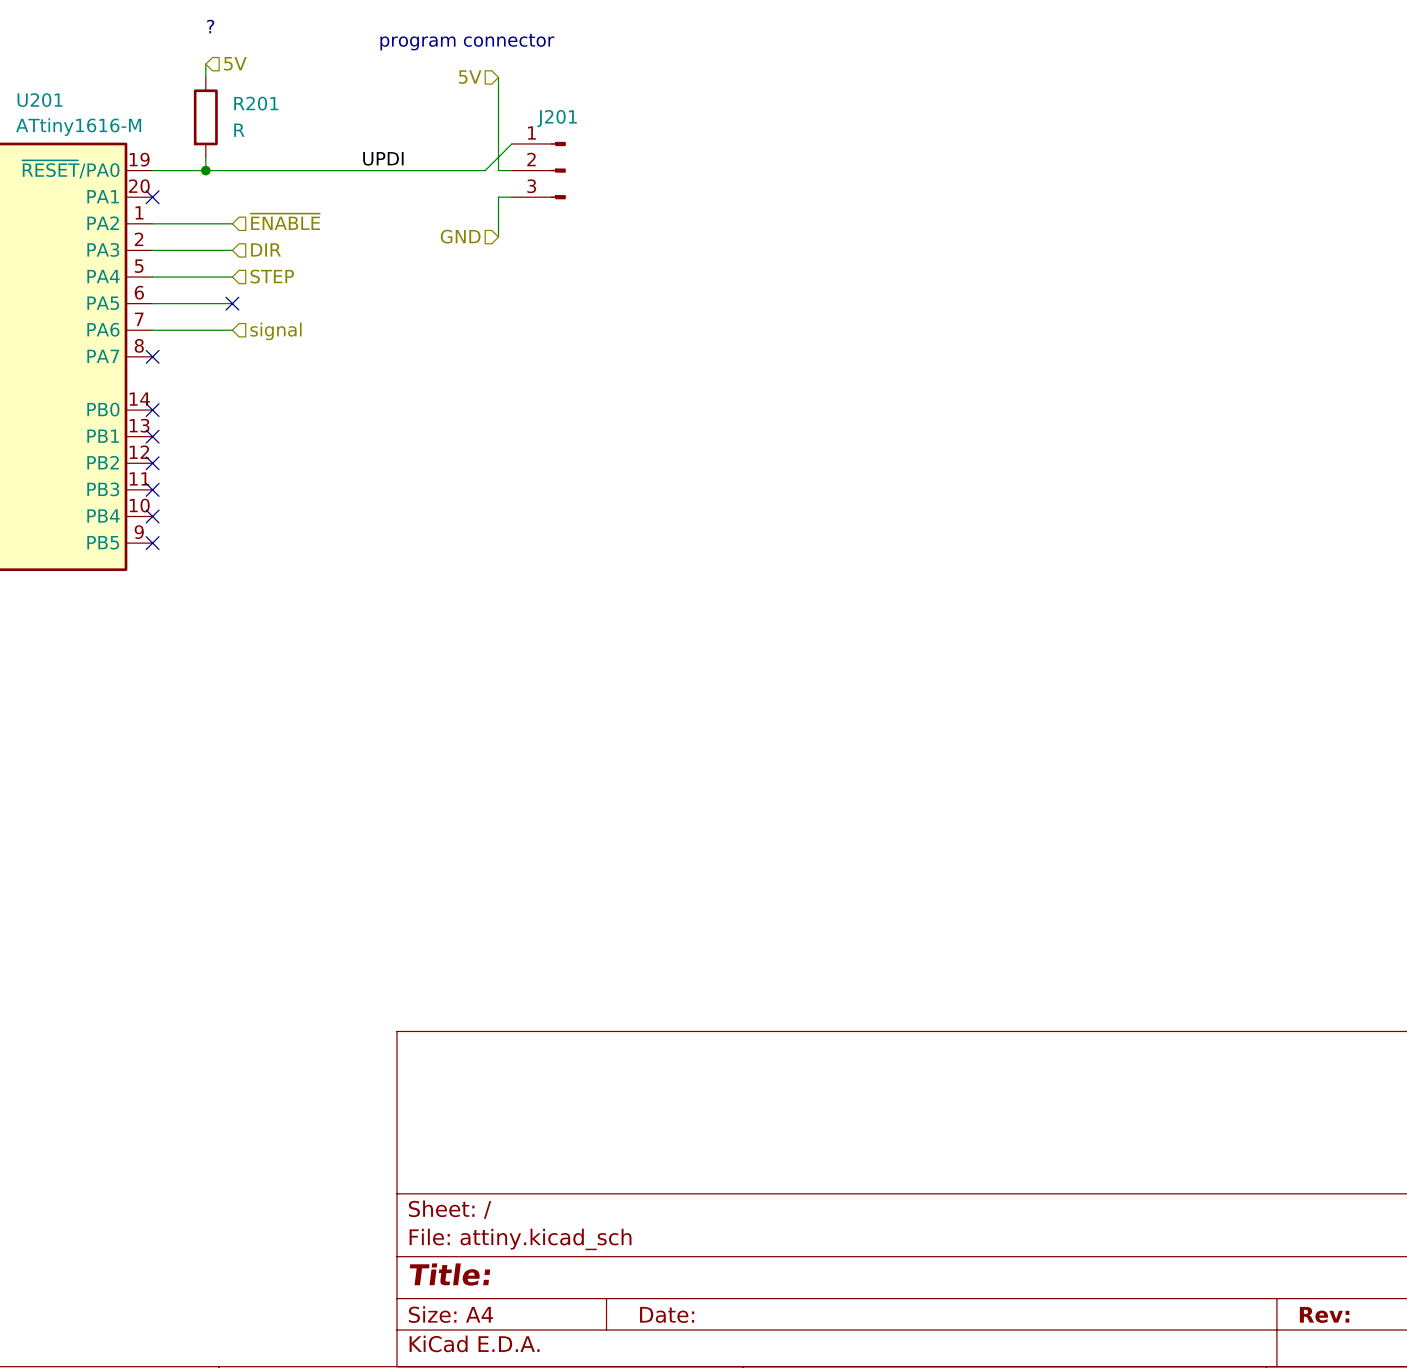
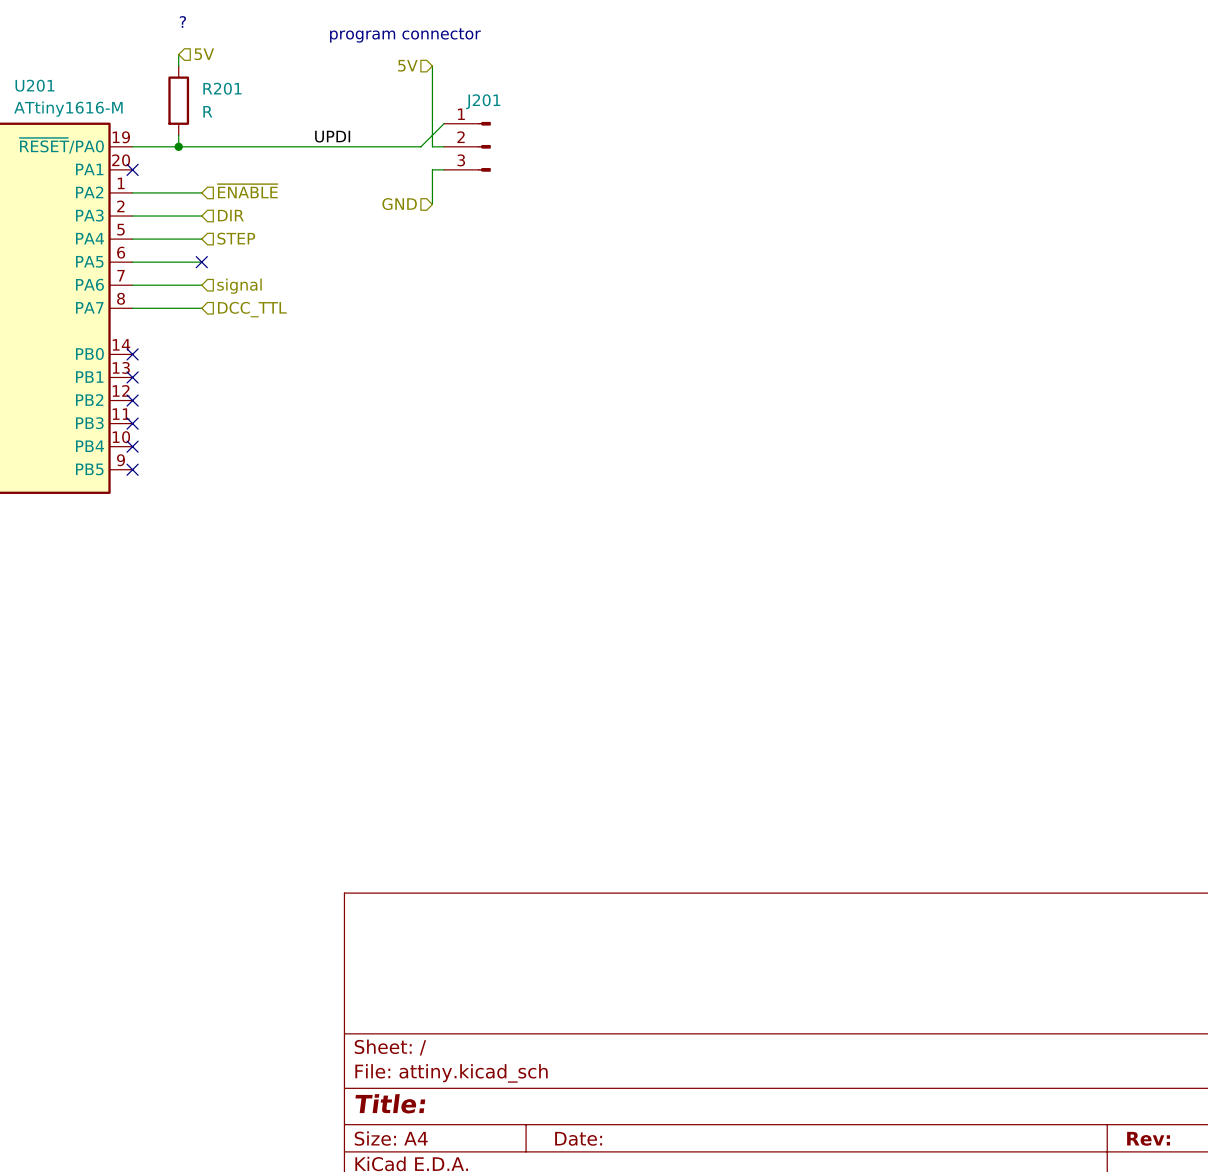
wire: none -> (132, 308) (201, 308)
no-connect mark: (152, 356) -> none
hierarchical label: none -> DCC_TTL (252, 309)

